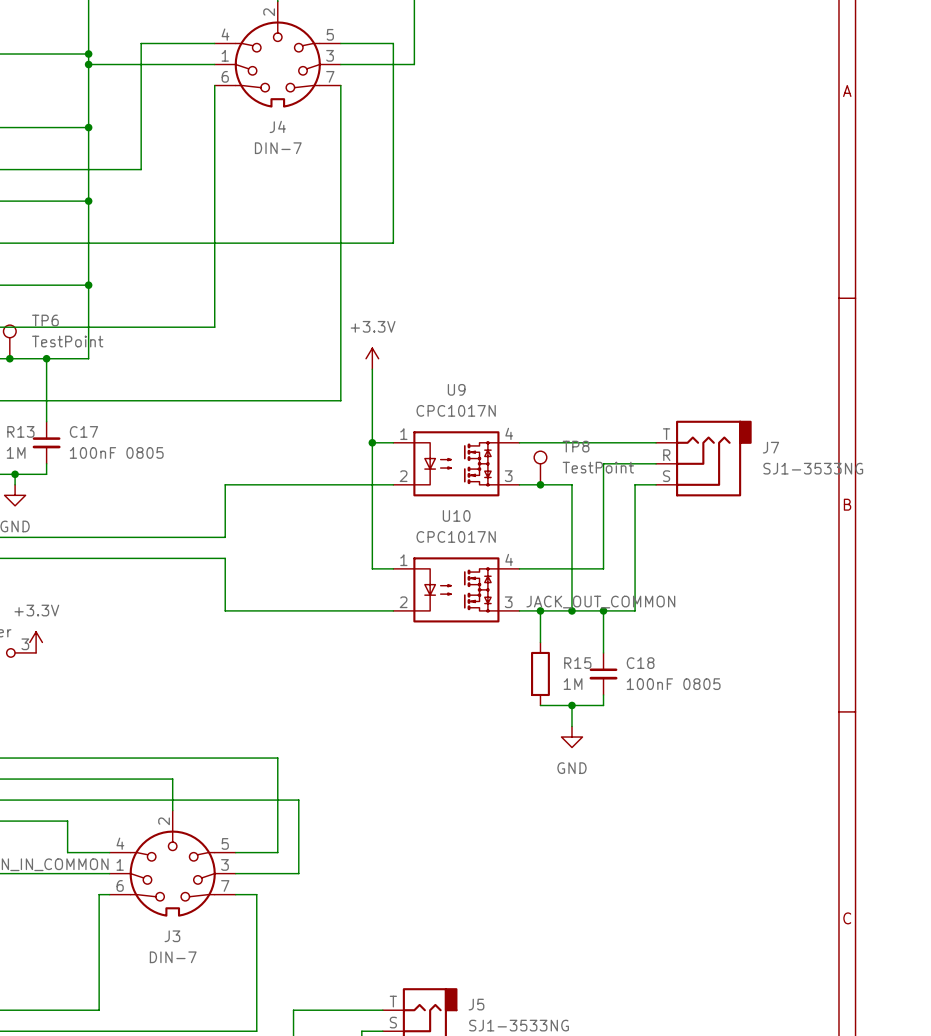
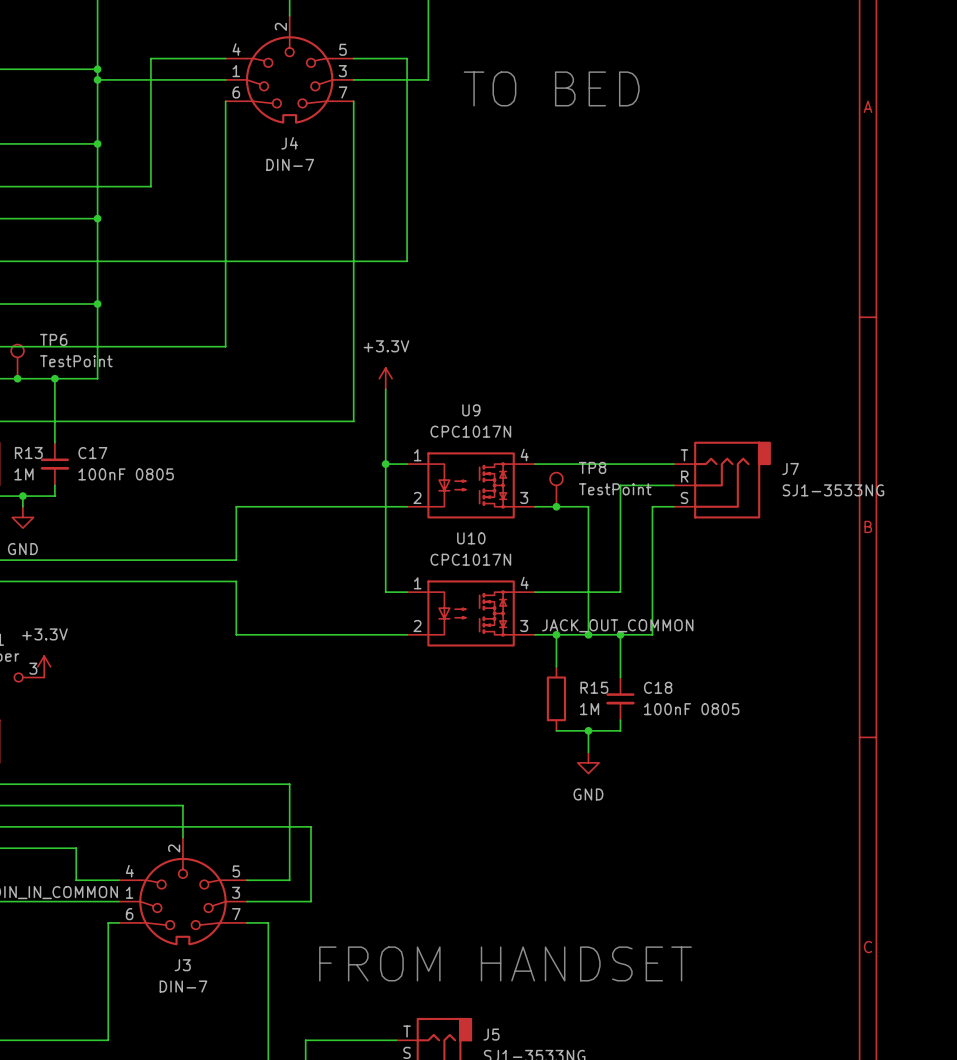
text: none -> TO BED (551, 88)
text: none -> FROM HANDSET (505, 963)

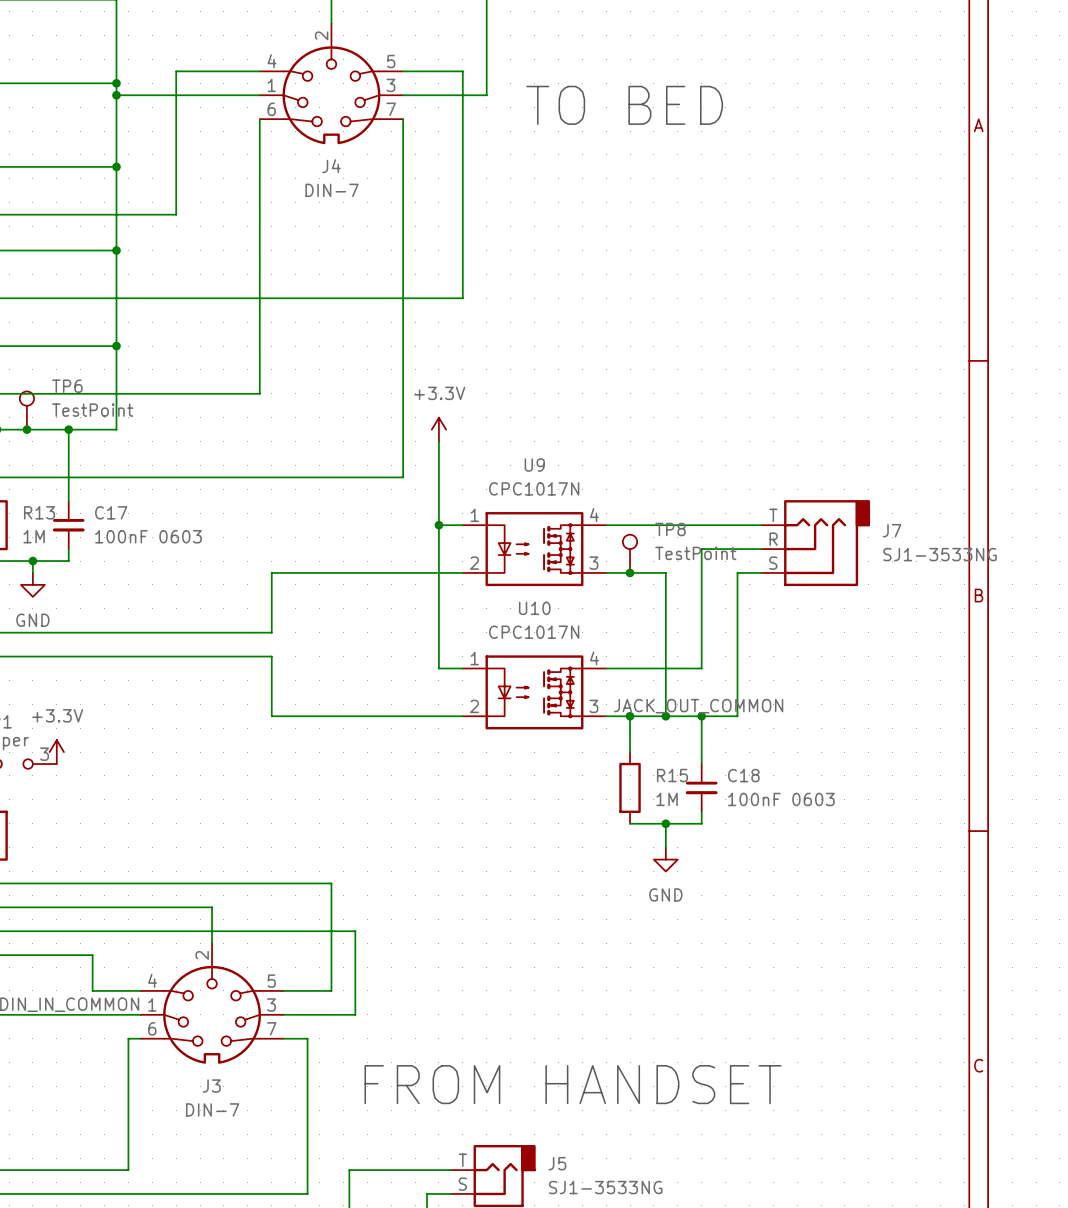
C17 value: 100nF 0805 (126, 474) -> 100nF 0603 (148, 536)
C18 value: 100nF 0805 (691, 709) -> 100nF 0603 (781, 799)

